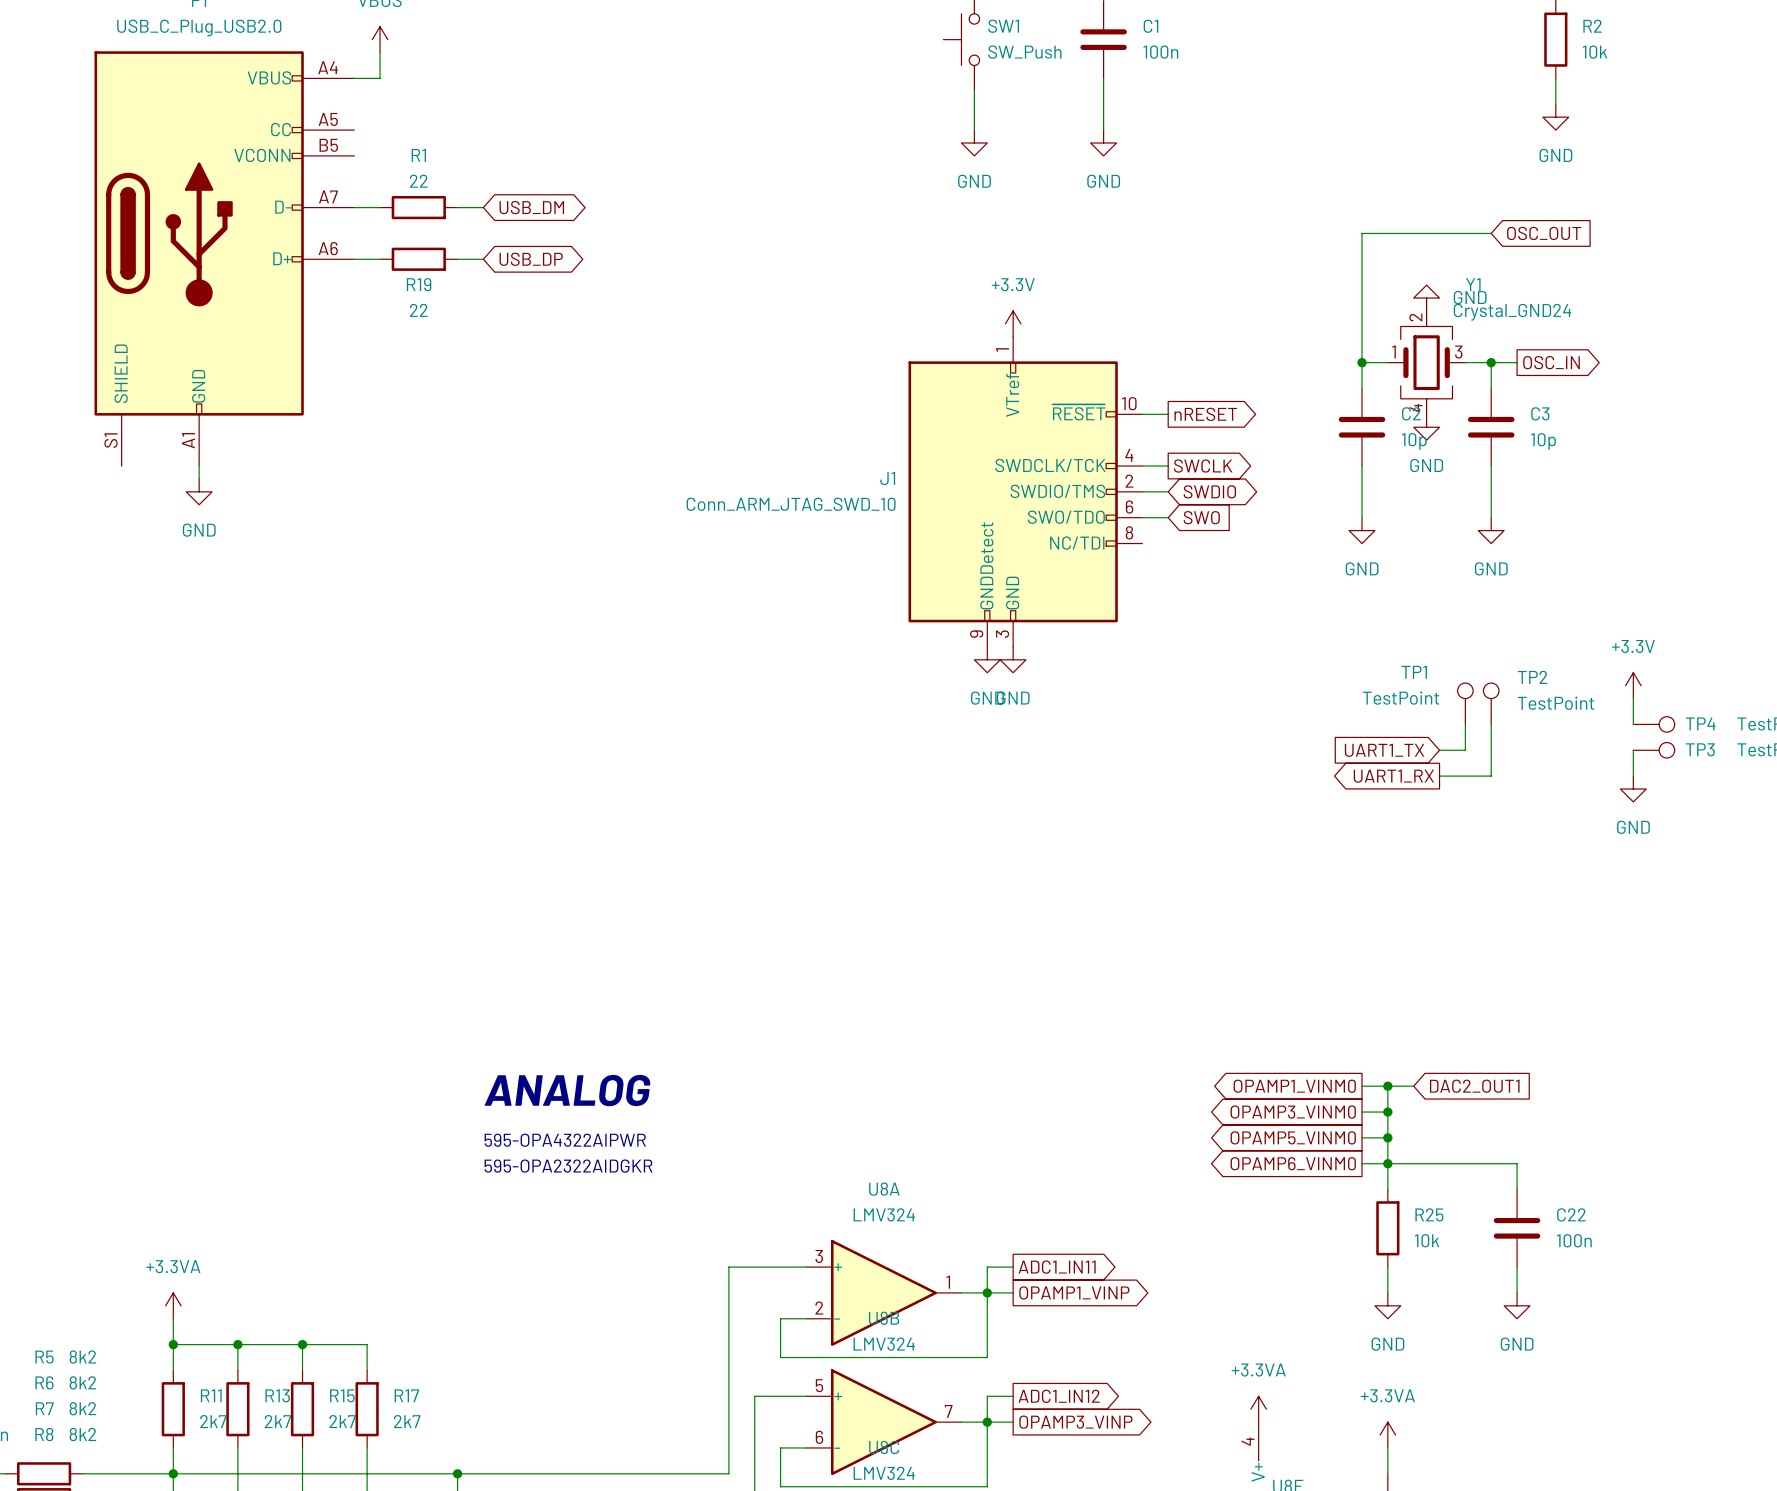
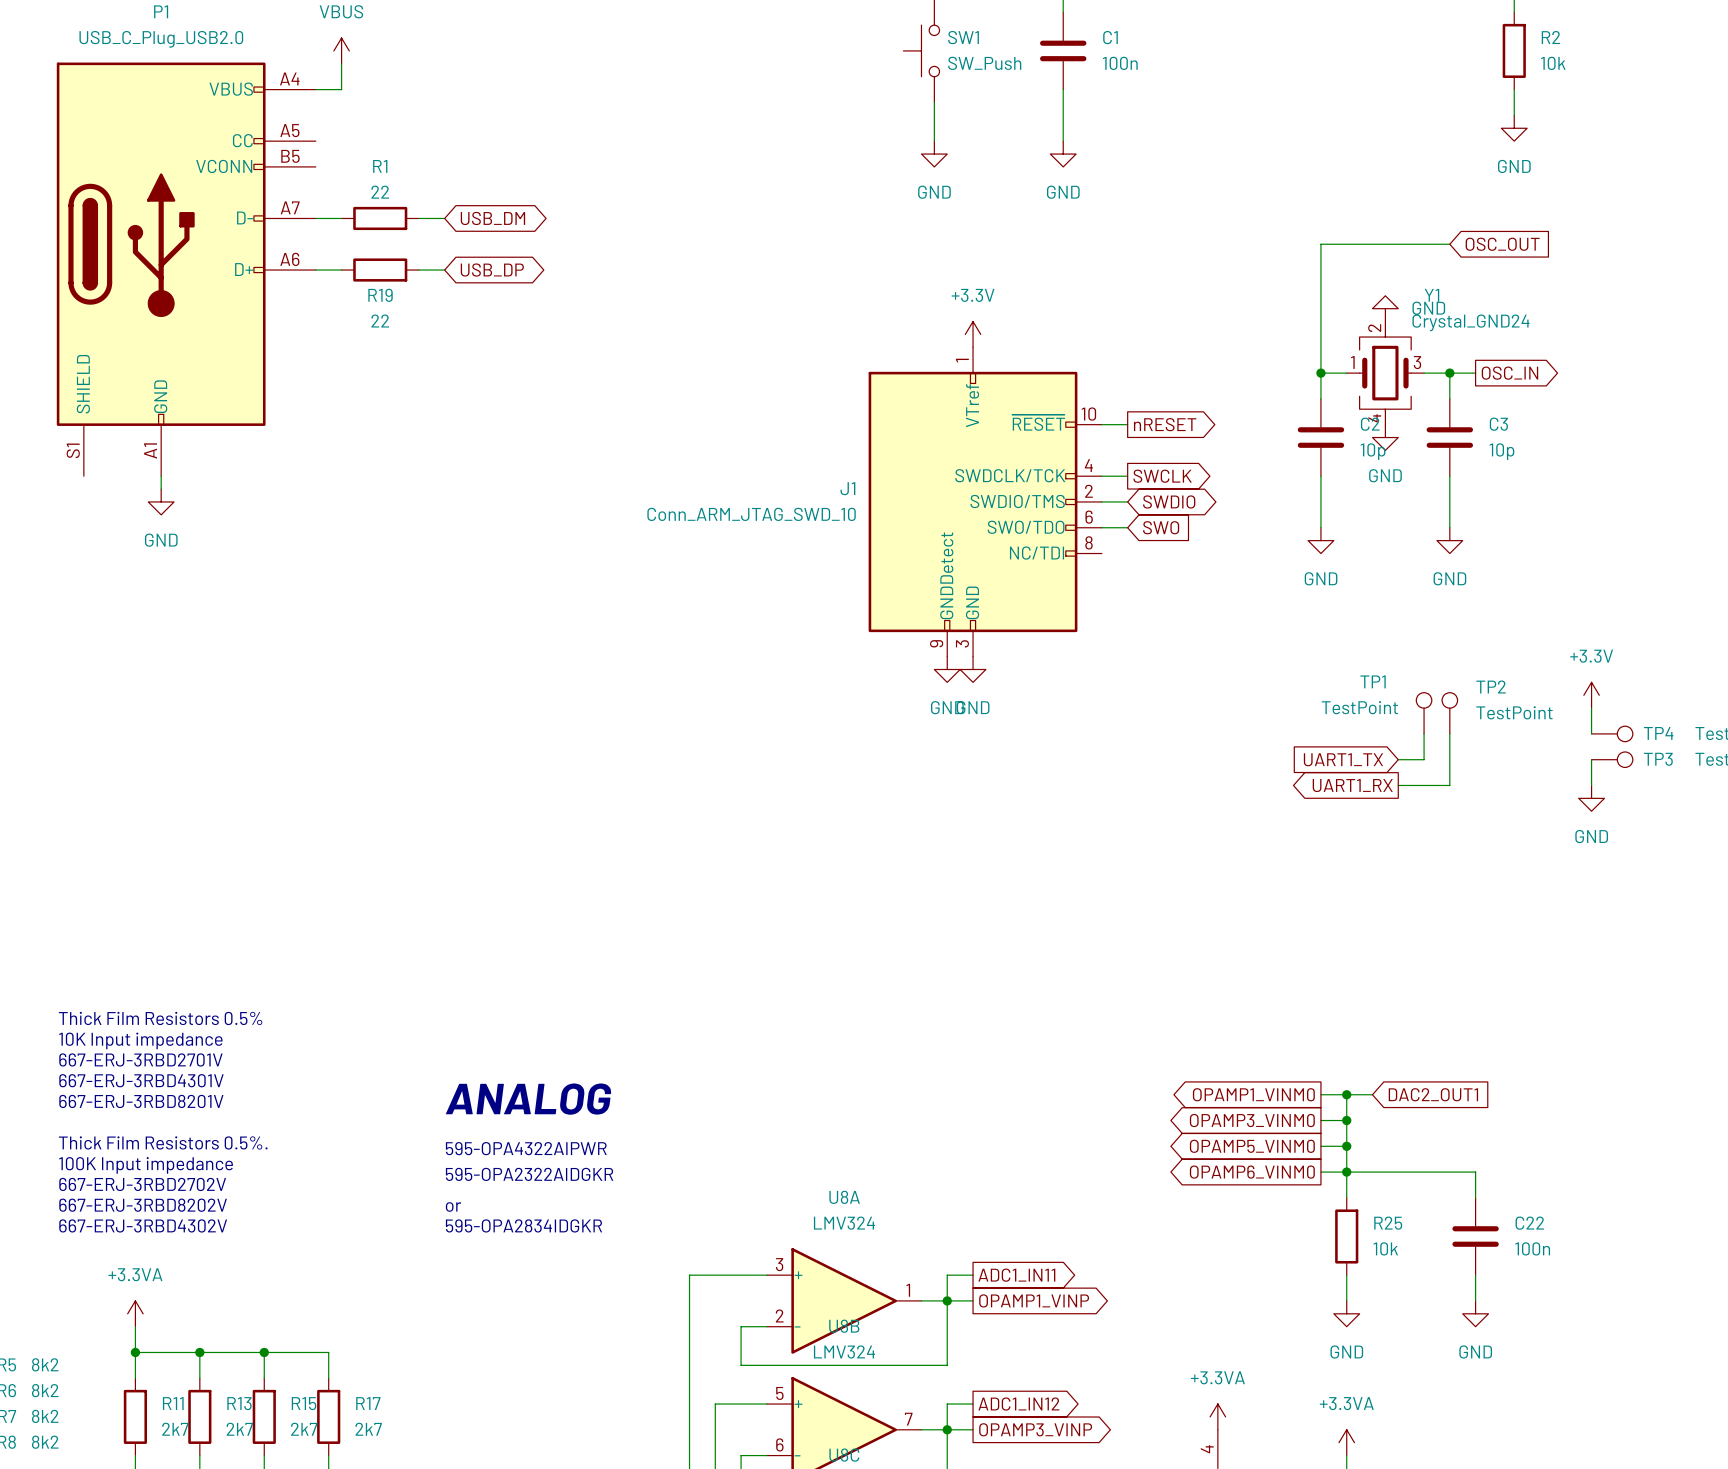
text: none -> Thick Film Resistors 0.5% (160, 1018)
text: none -> 10K Input impedance (140, 1040)
text: none -> 667-ERJ-3RBD2701V (140, 1059)
text: none -> 667-ERJ-3RBD4301V (141, 1080)
text: none -> 667-ERJ-3RBD8201V (141, 1101)
text: none -> Thick Film Resistors 0.5%. (163, 1142)
text: none -> 100K Input impedance (146, 1165)
text: none -> 667-ERJ-3RBD2702V (142, 1184)
text: none -> 667-ERJ-3RBD8202V (143, 1205)
text: none -> or (453, 1206)
text: none -> 667-ERJ-3RBD4302V (143, 1225)
text: none -> 595-OPA2834IDGKR (523, 1225)

